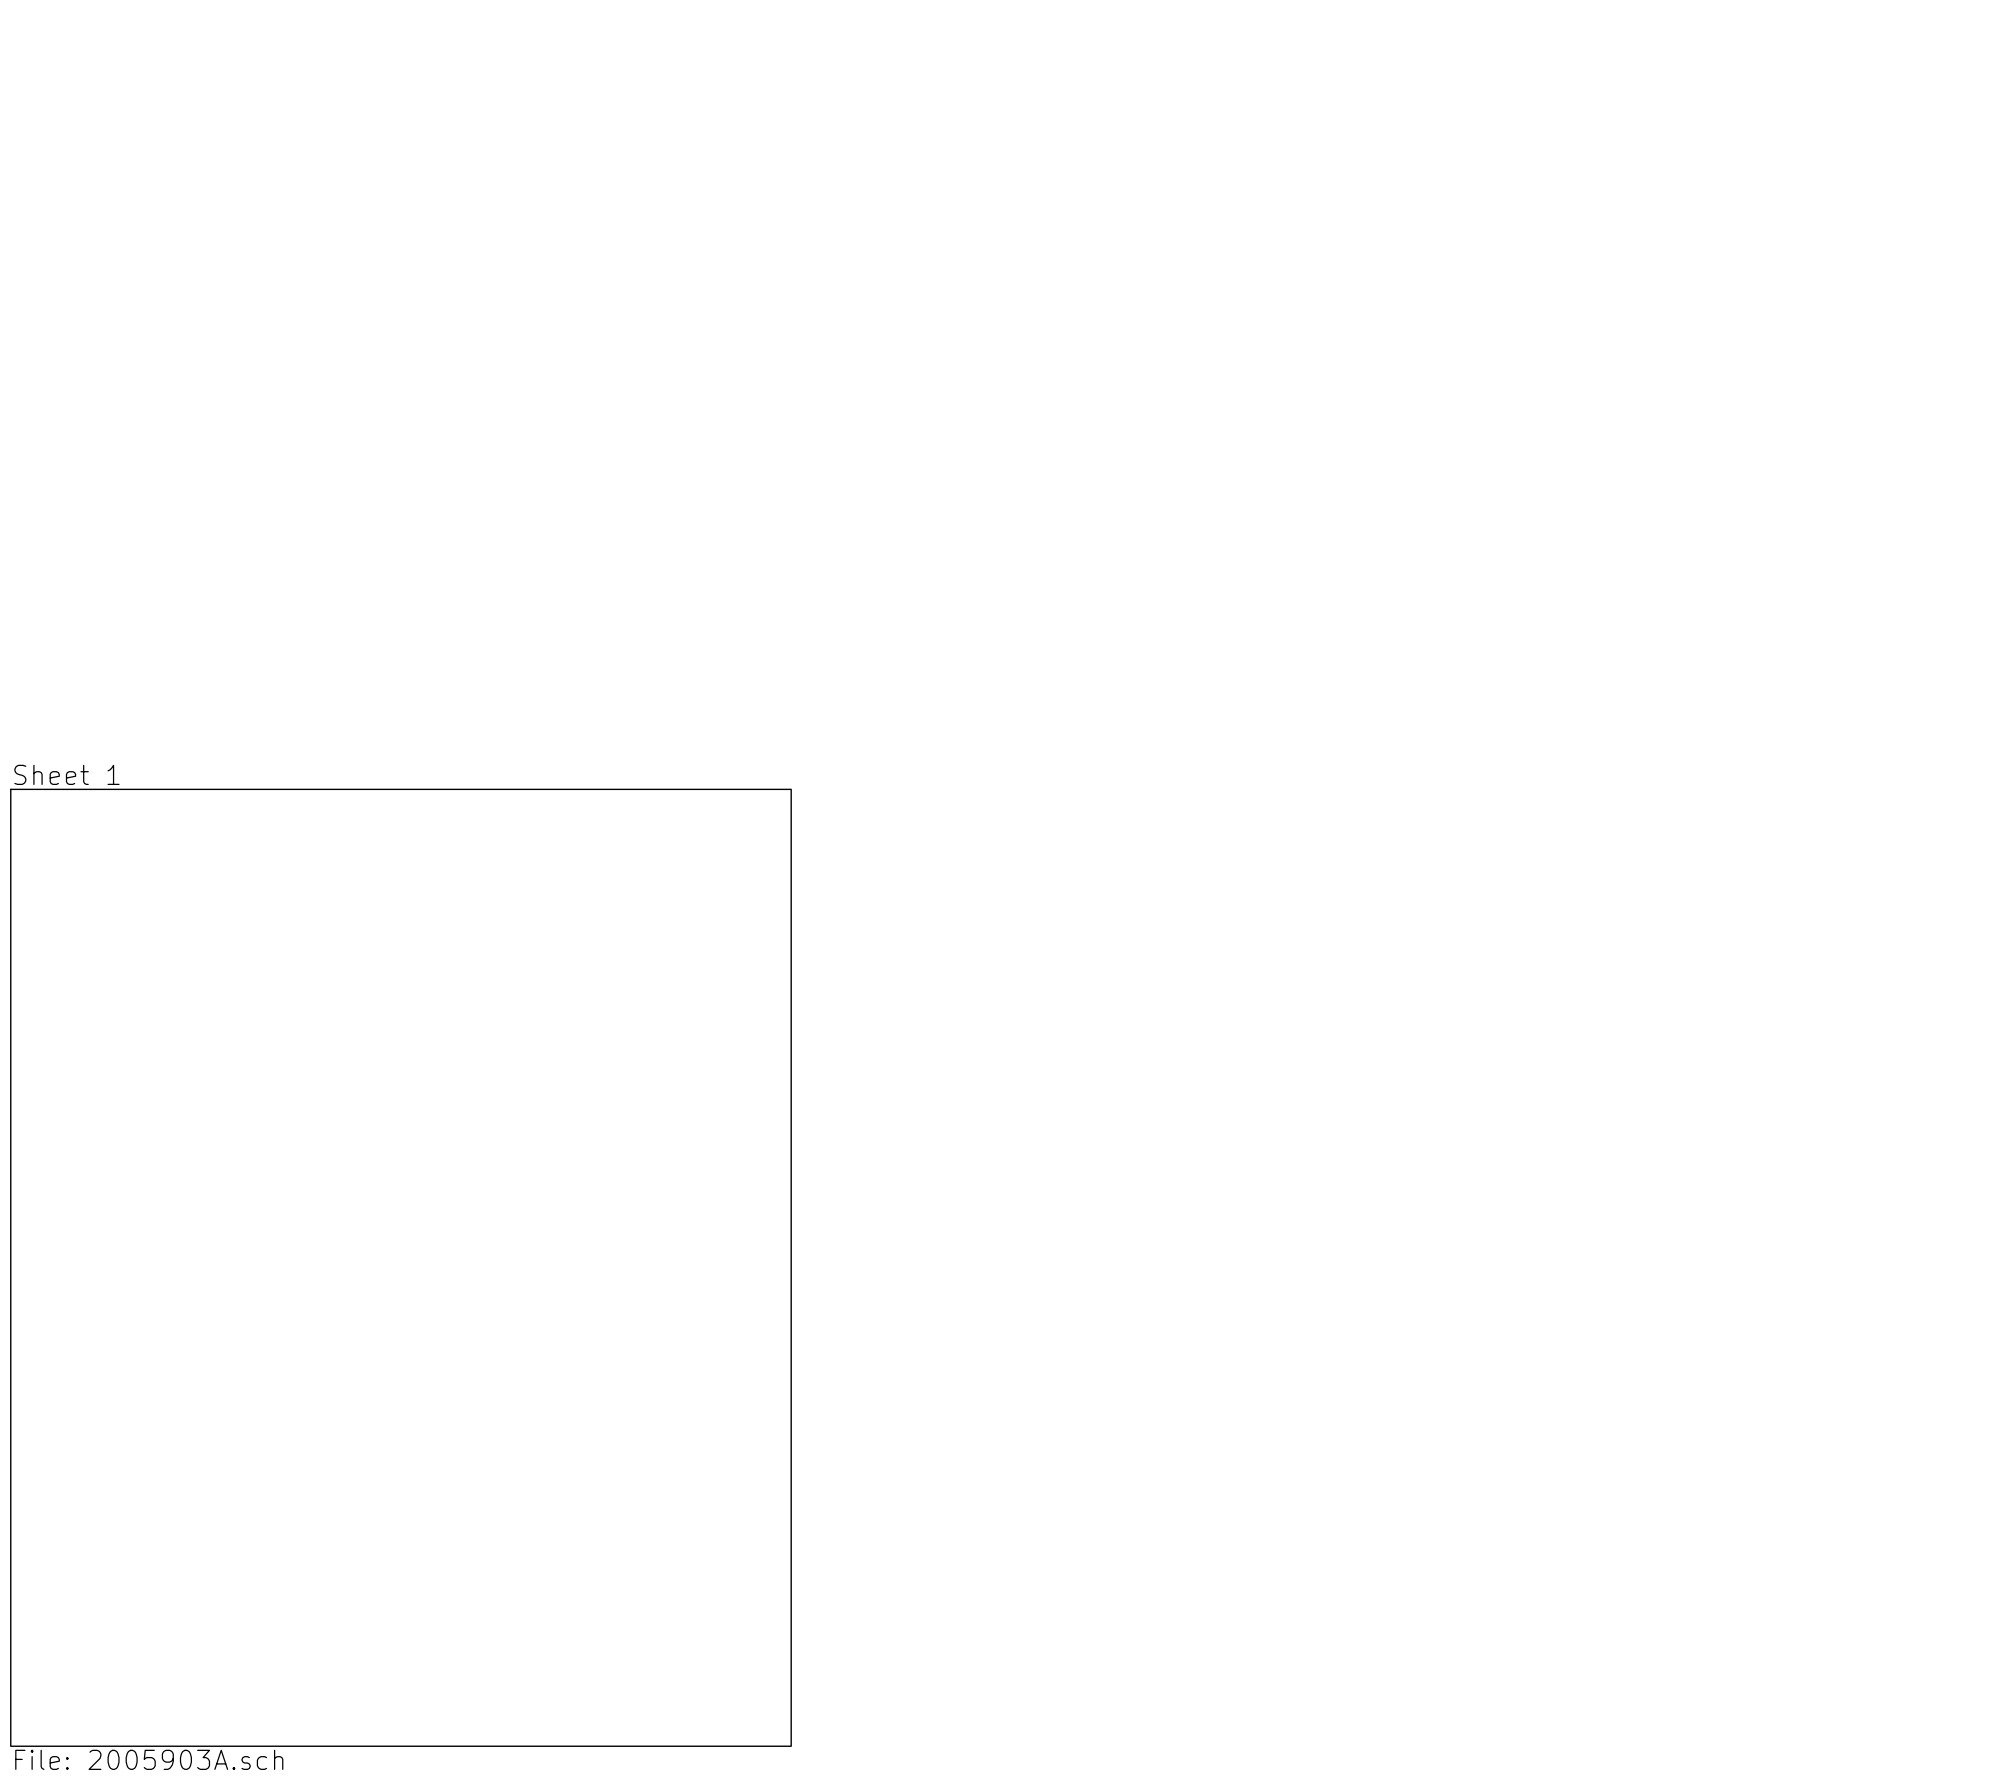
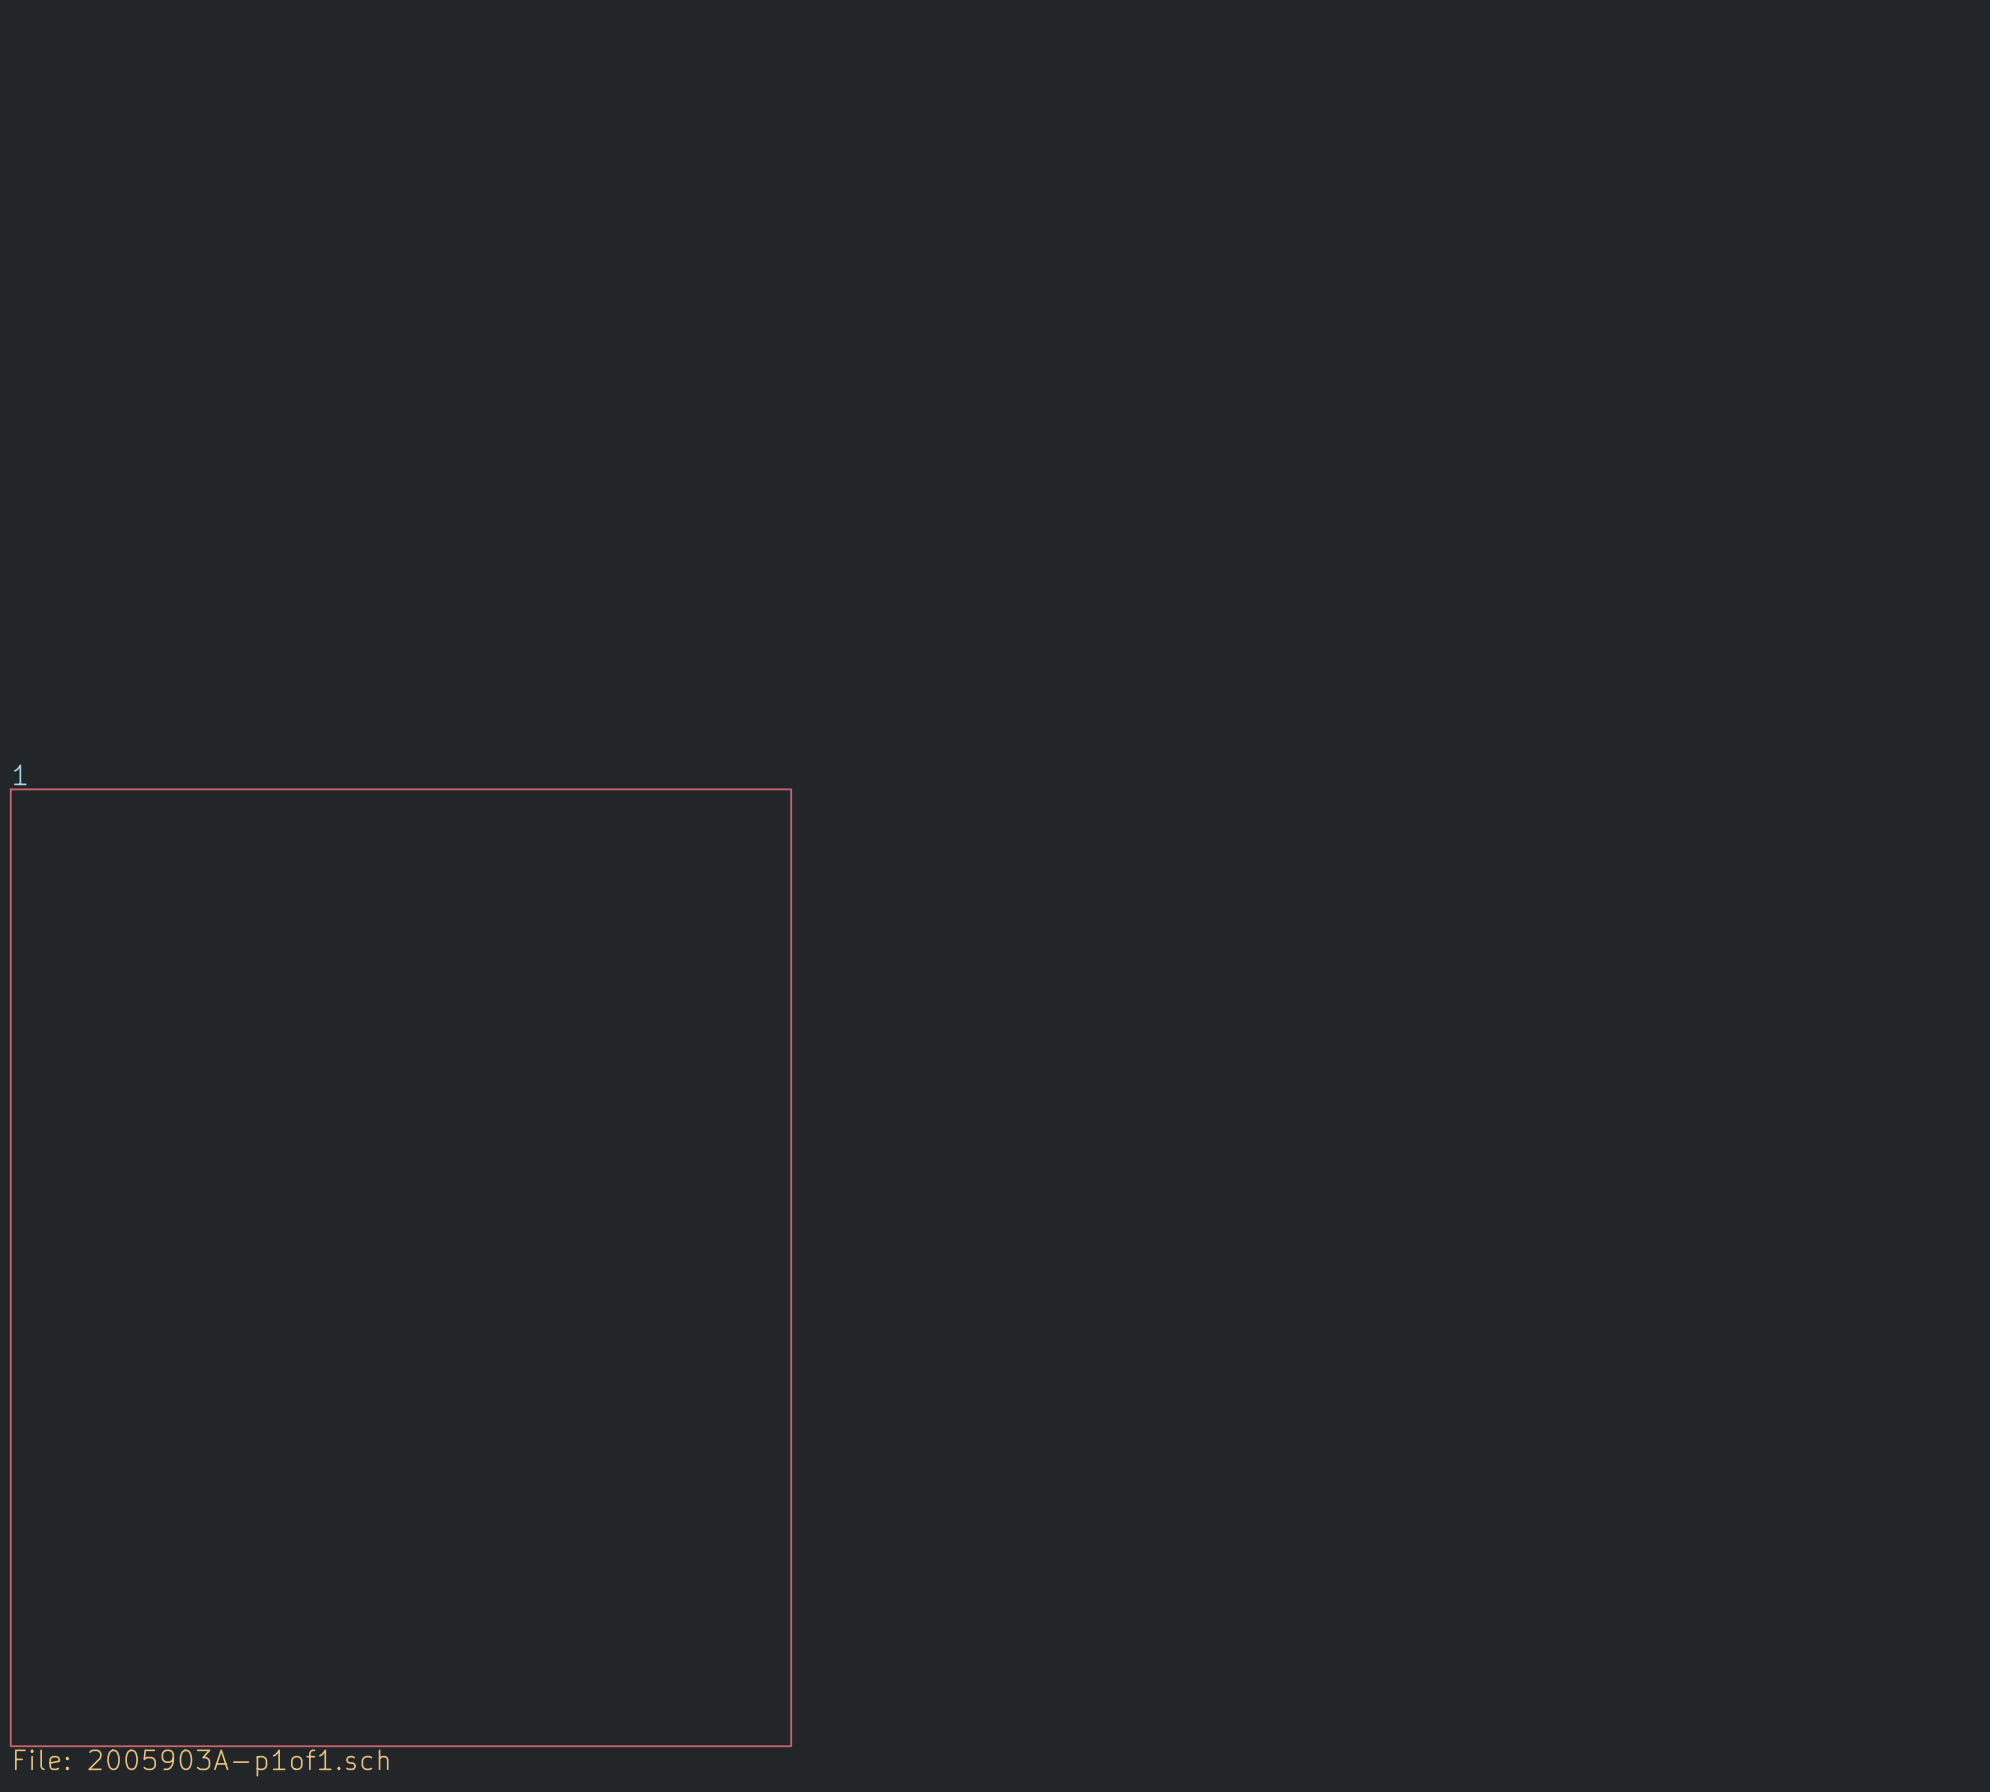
sheet Sheet 1 name: Sheet 1 (66, 774) -> 1 (20, 774)
sheet Sheet 1 value: File: 2005903A.sch (149, 1759) -> File: 2005903A-p1of1.sch (201, 1763)

